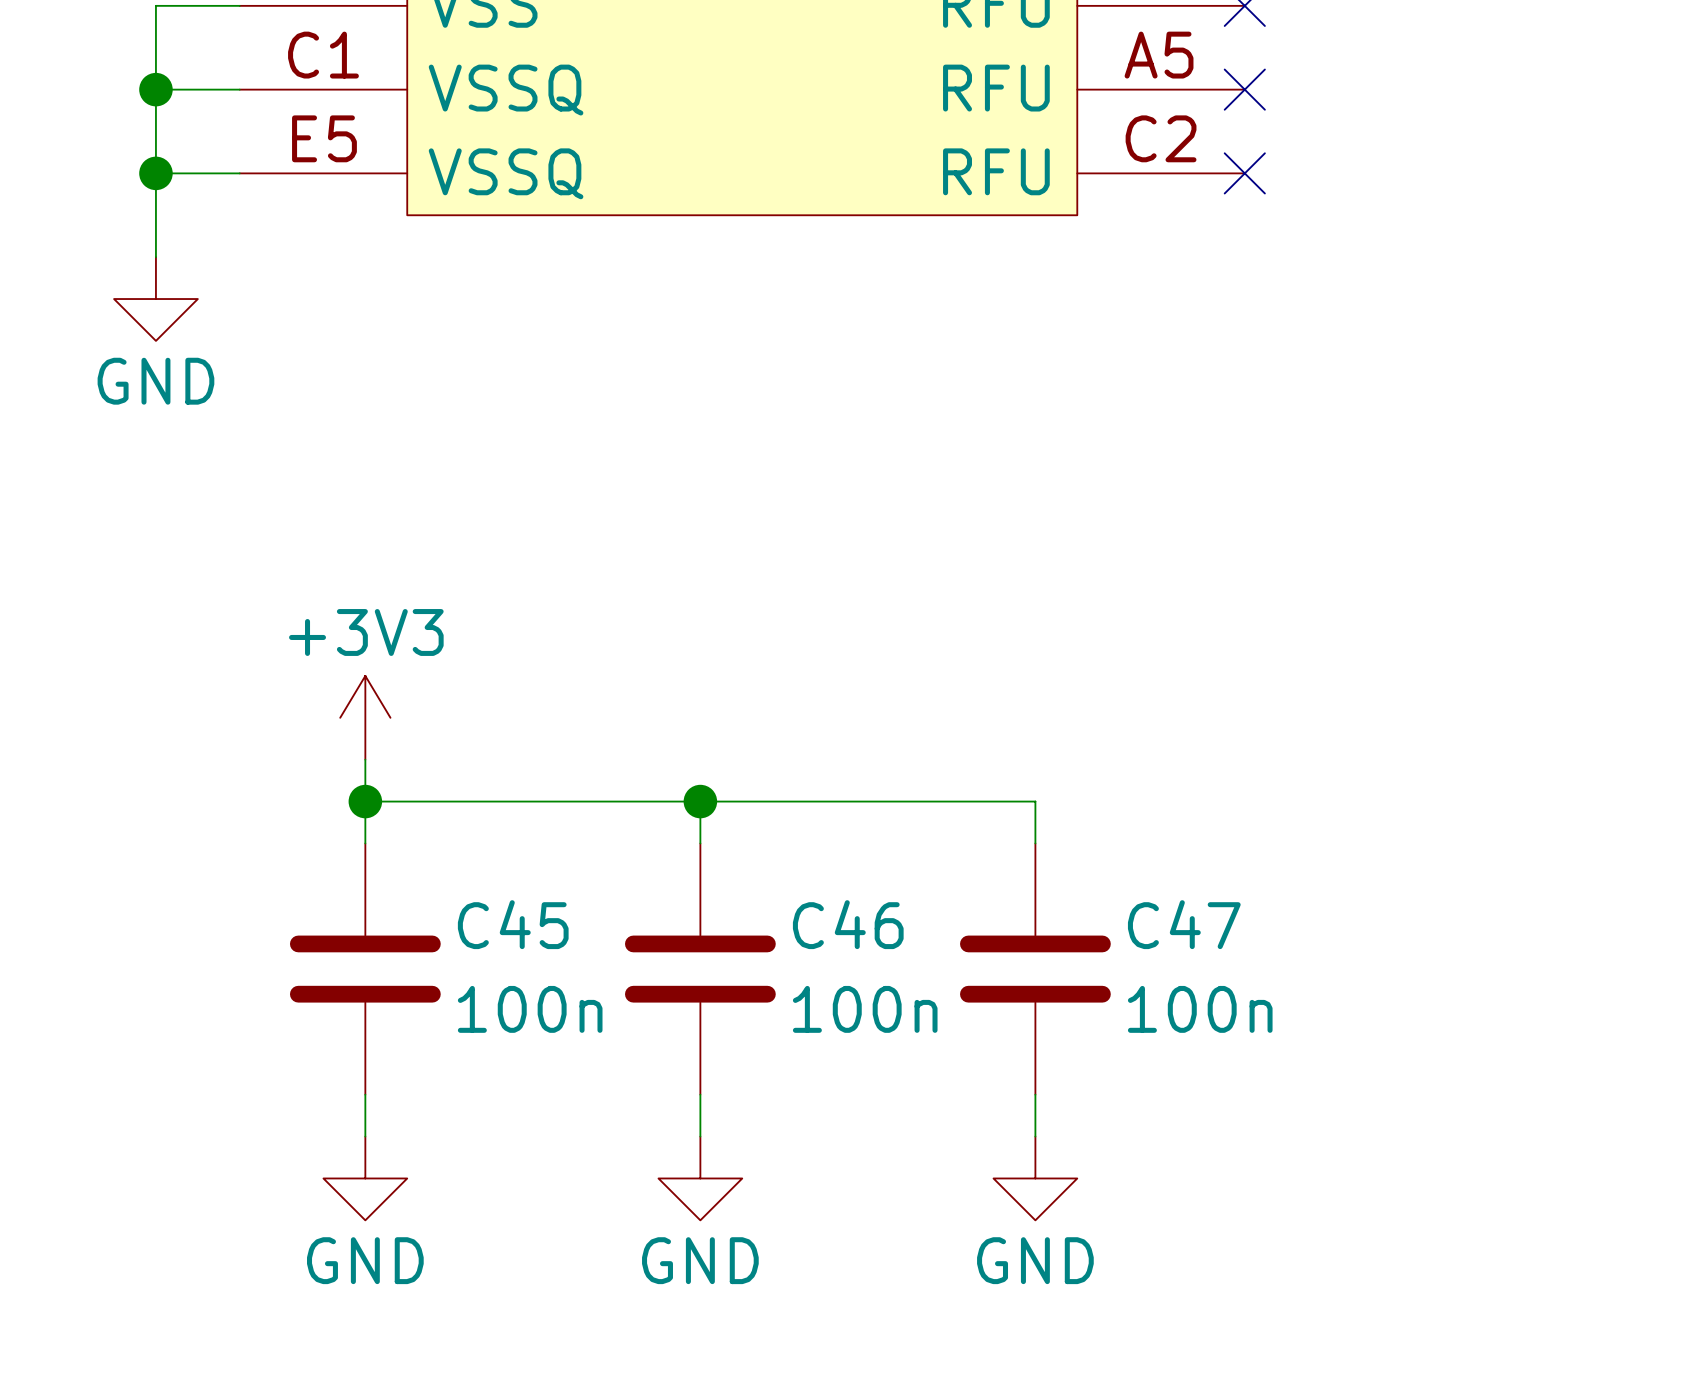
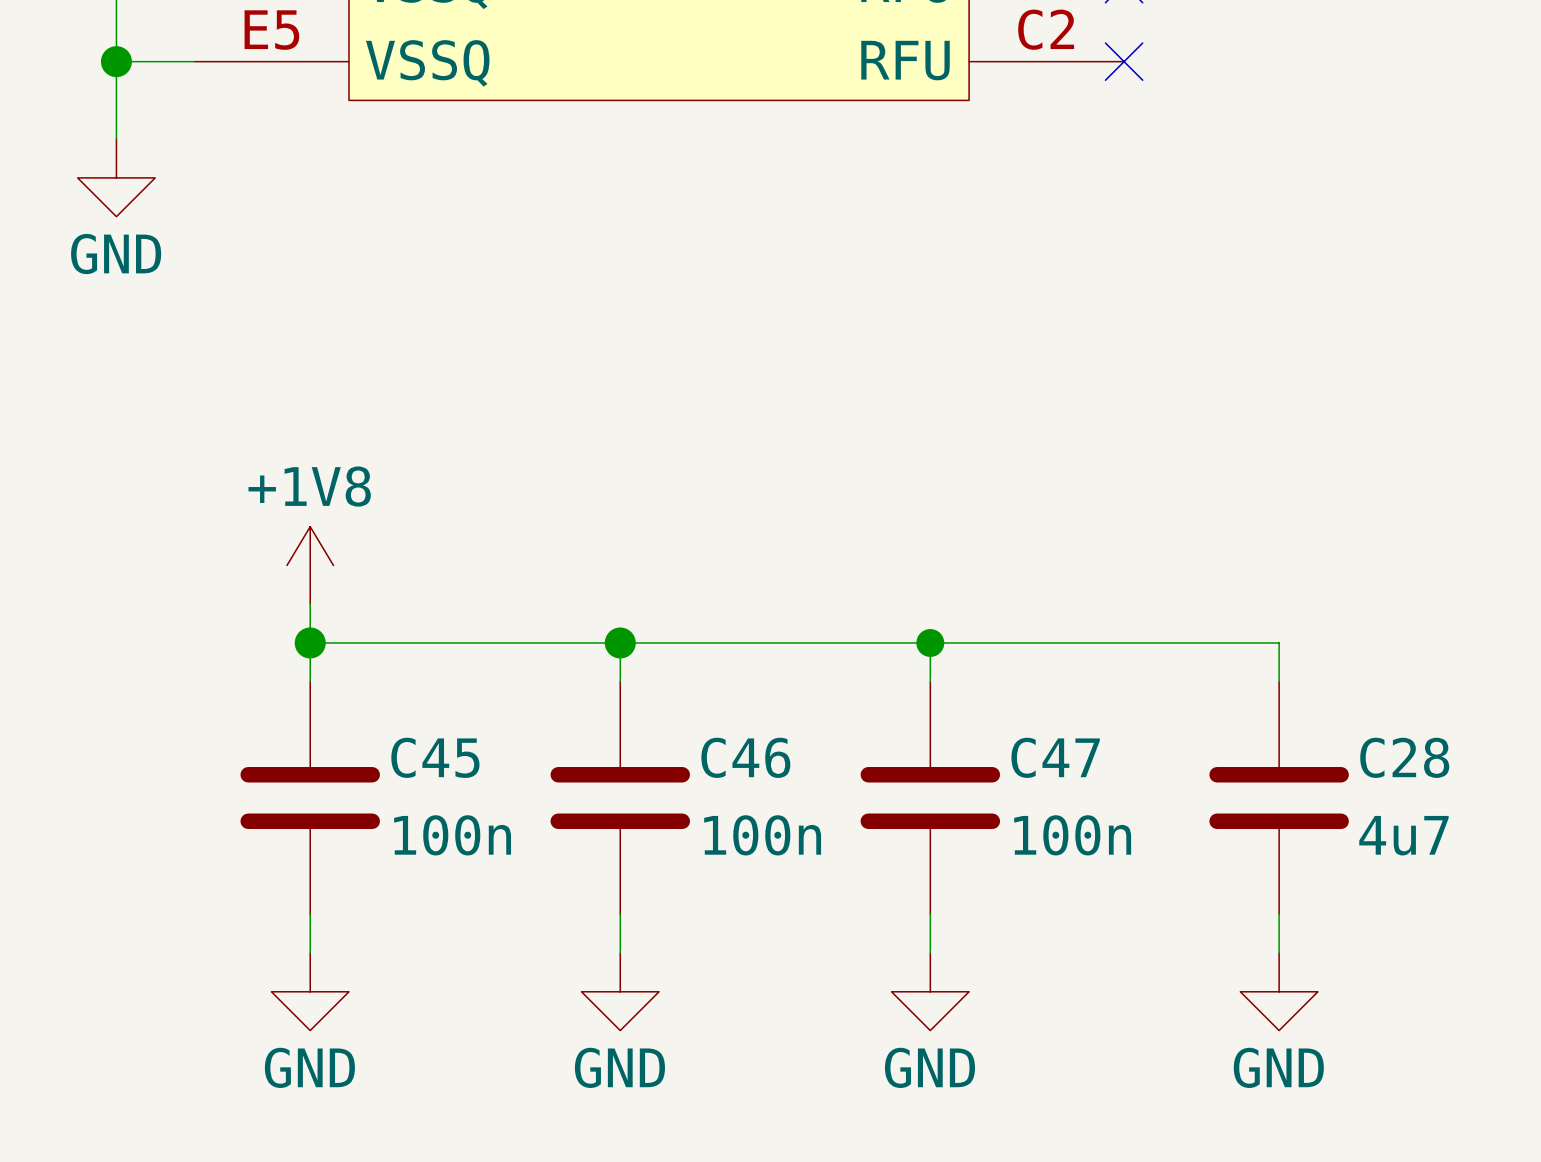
power symbol: +3V3 (365, 717) -> +1V8 (310, 565)
wire: none -> (930, 642) (1279, 642) (1279, 681)
junction: none -> (930, 642)
C28: none -> 4u7 (1279, 798)
wire: none -> (1279, 914) (1279, 953)
power symbol: none -> GND (1279, 991)

